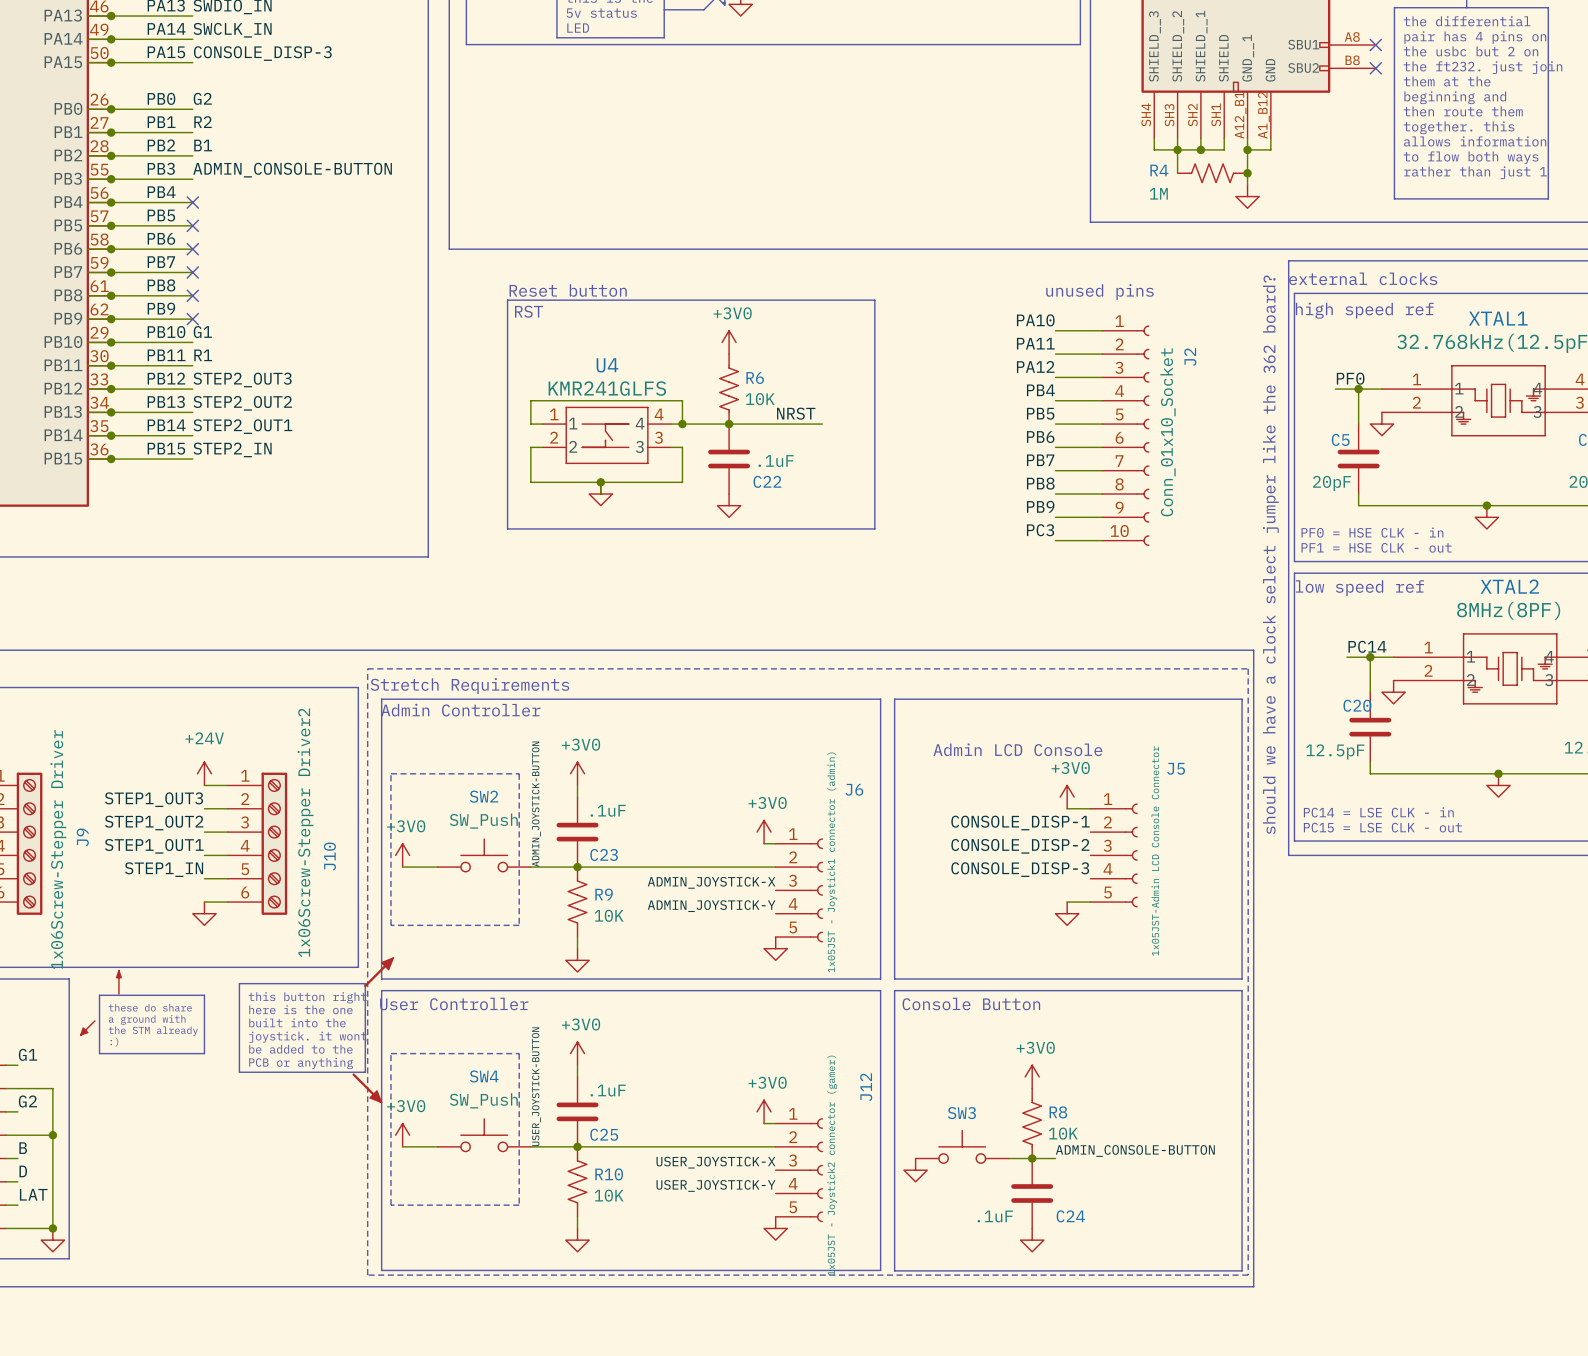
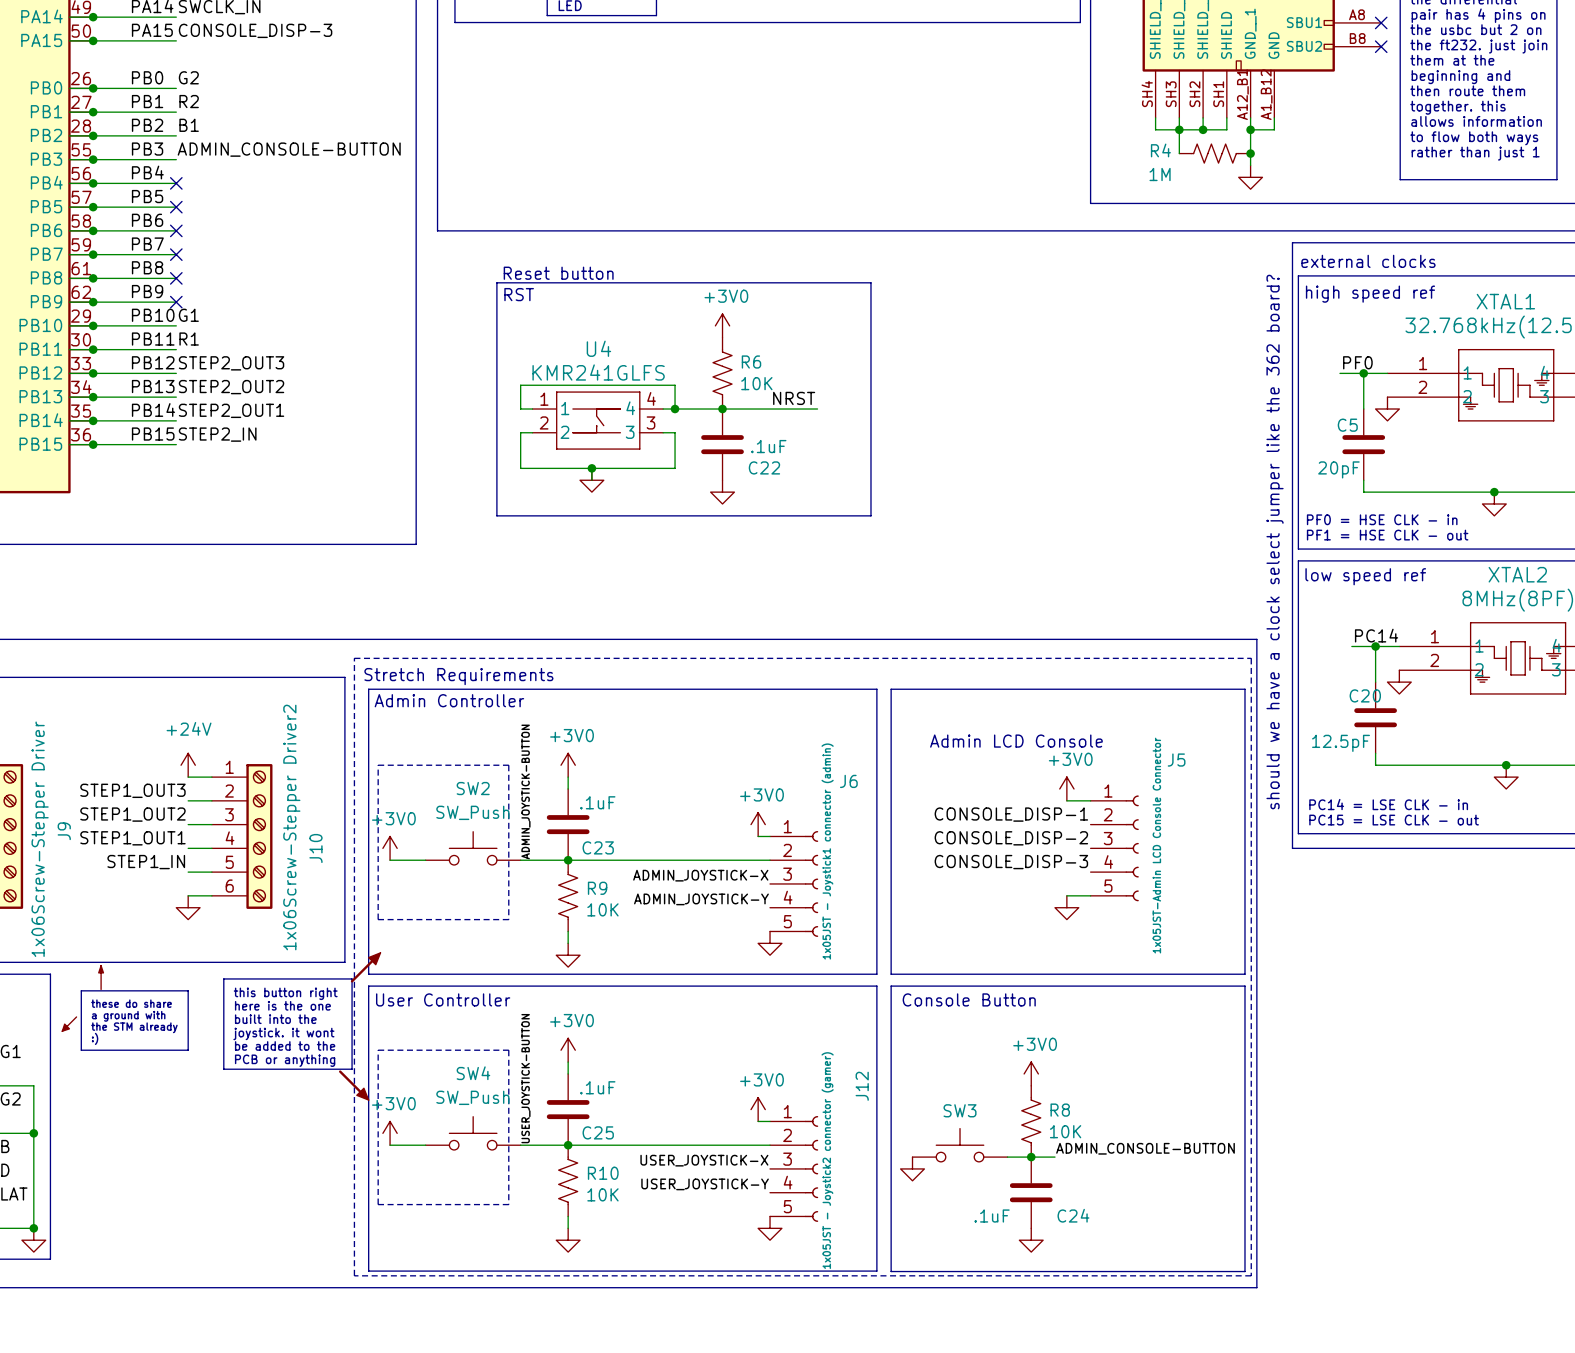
text: unused pins (1099, 291) -> none
label: PA10 (1035, 320) -> none
wire: (1055, 330) (1102, 330) -> none
label: PA11 (1035, 343) -> none
wire: (1055, 354) (1102, 354) -> none
label: PA12 (1035, 366) -> none
wire: (1055, 377) (1102, 377) -> none
label: PB4 (1040, 390) -> none
wire: (1055, 400) (1102, 400) -> none
label: PB5 (1040, 413) -> none
wire: (1055, 424) (1102, 424) -> none
J2: Conn_01x10_Socket (1125, 435) -> none
label: PB6 (1040, 437) -> none
wire: (1055, 447) (1102, 447) -> none
label: PB7 (1040, 460) -> none
wire: (1055, 470) (1102, 470) -> none
label: PB8 (1040, 483) -> none
wire: (1055, 494) (1102, 494) -> none
label: PB9 (1040, 506) -> none
wire: (1055, 517) (1102, 517) -> none
label: PC3 (1040, 530) -> none
wire: (1055, 540) (1102, 540) -> none

